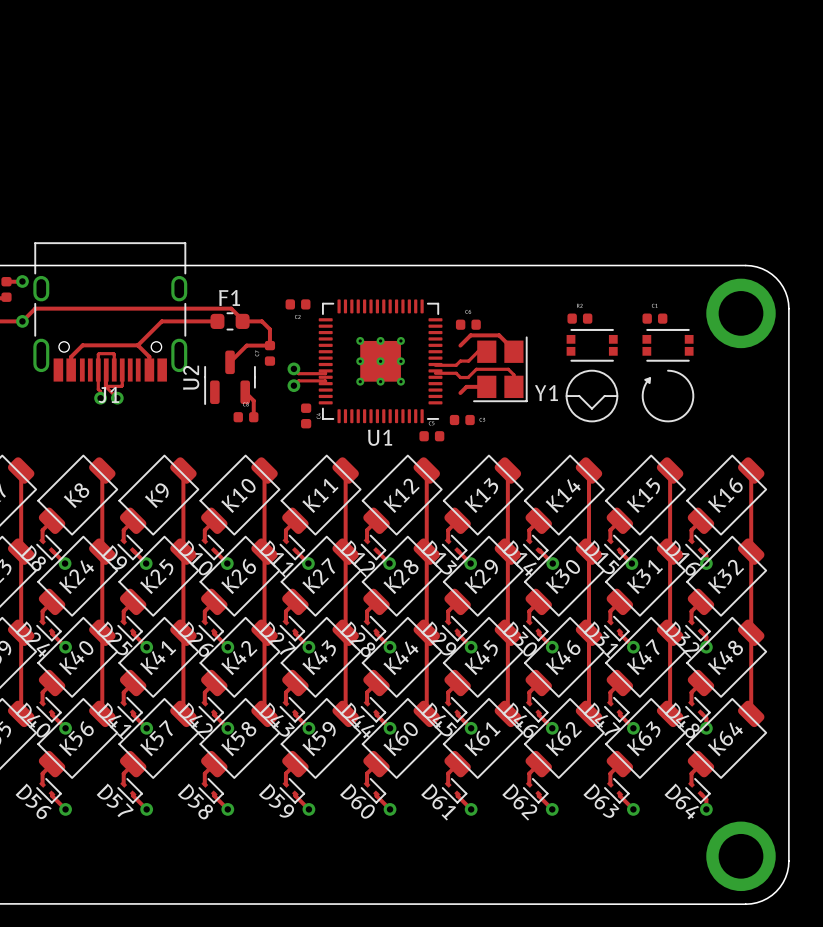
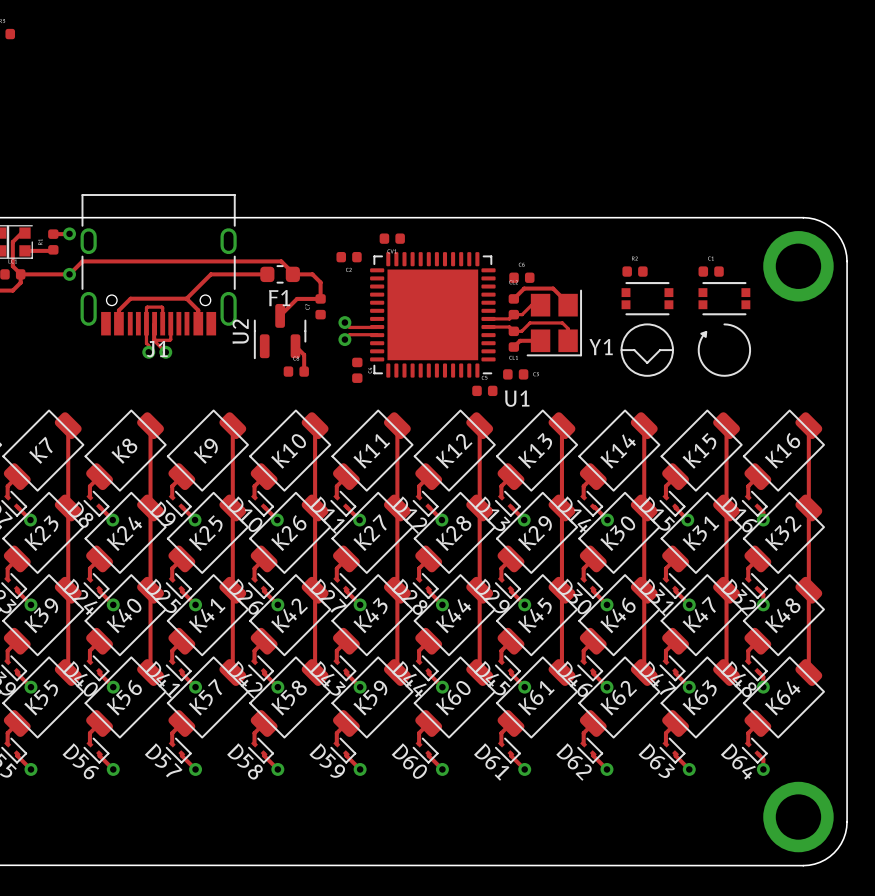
part: none -> (392, 238)
F1 name position: F1 (229, 297) -> F1 (279, 298)
U1 footprint: [318, 299, 443, 424] -> [370, 252, 496, 378]
part: none -> (513, 306)
part: none -> (513, 339)
U1 name position: U1 (380, 437) -> U1 (517, 398)

